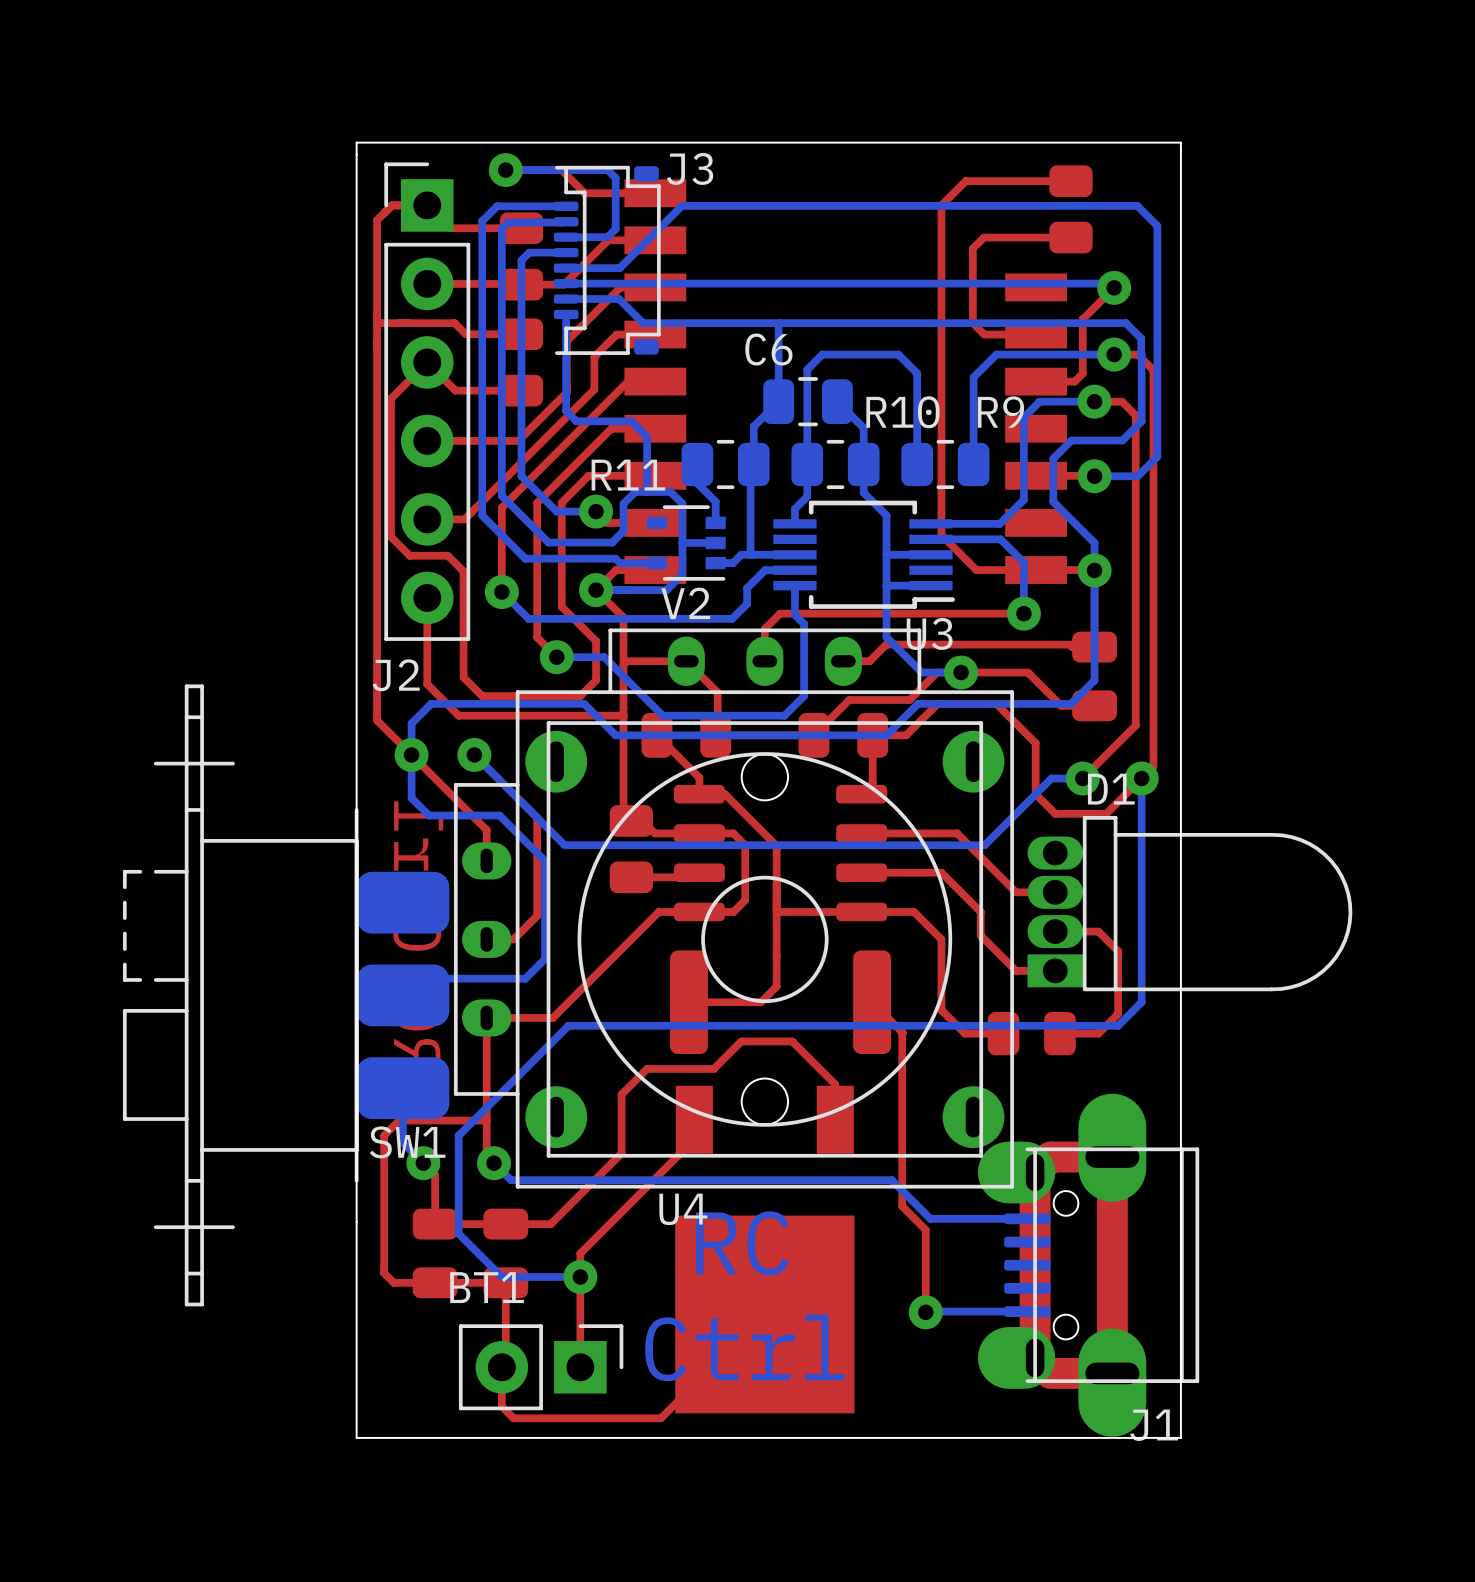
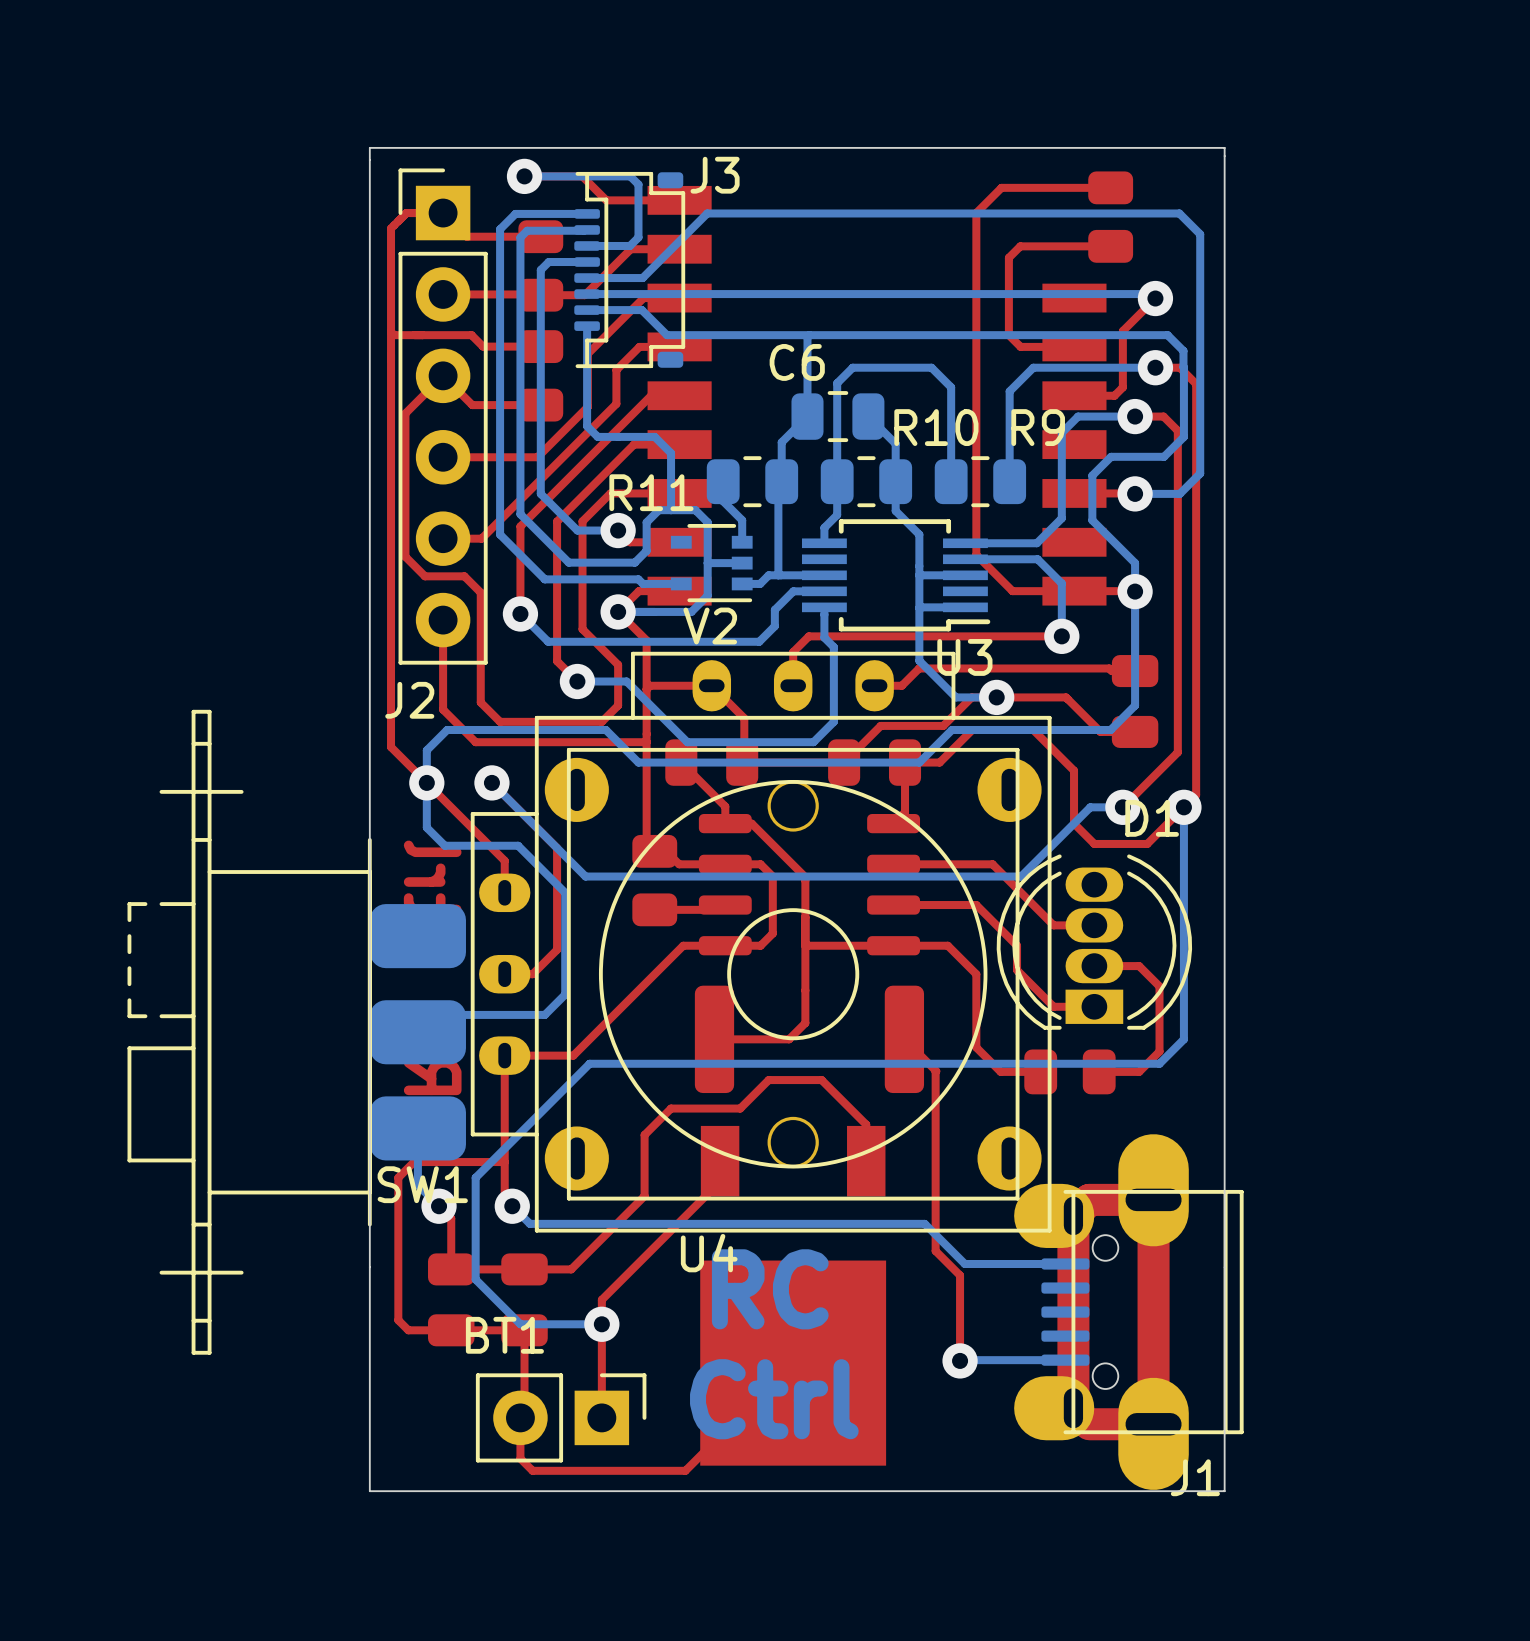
U4 footprint: [453, 628, 1014, 1189] -> [470, 651, 1052, 1233]
D1 footprint: [1027, 815, 1353, 992] -> [996, 854, 1193, 1030]

